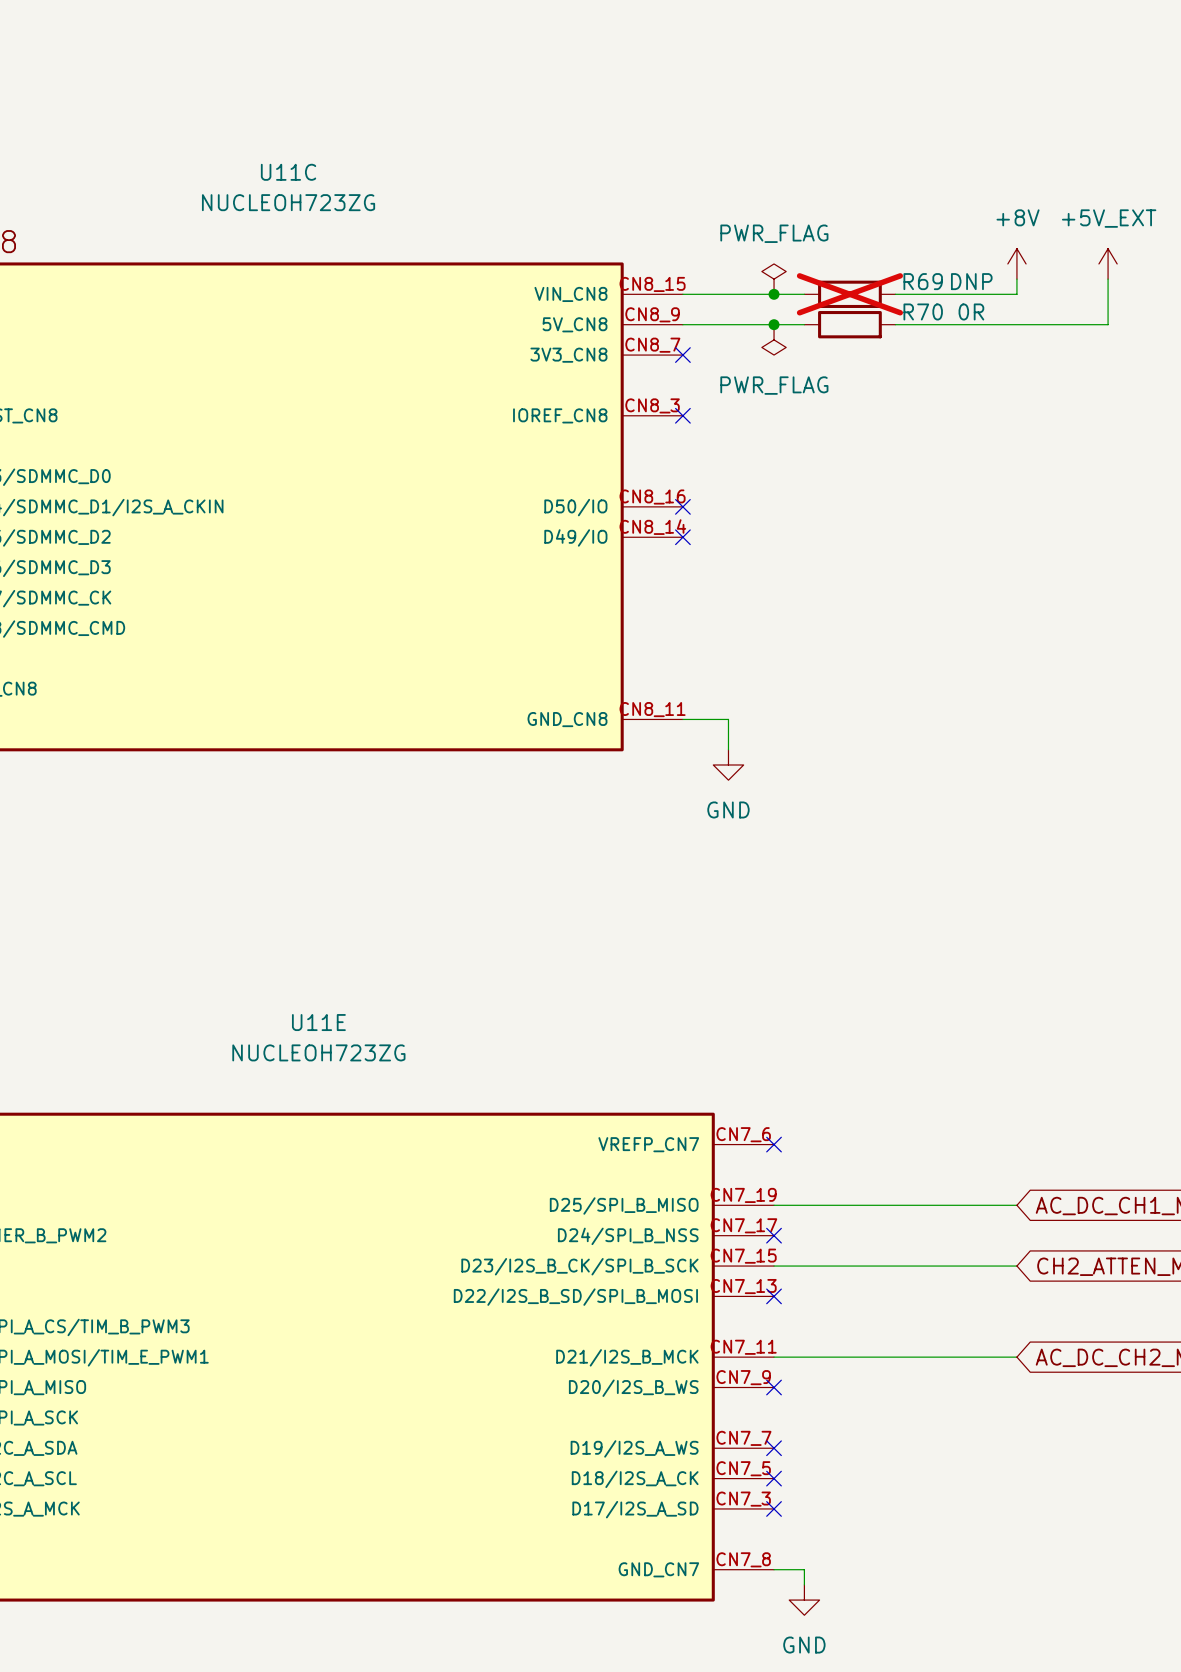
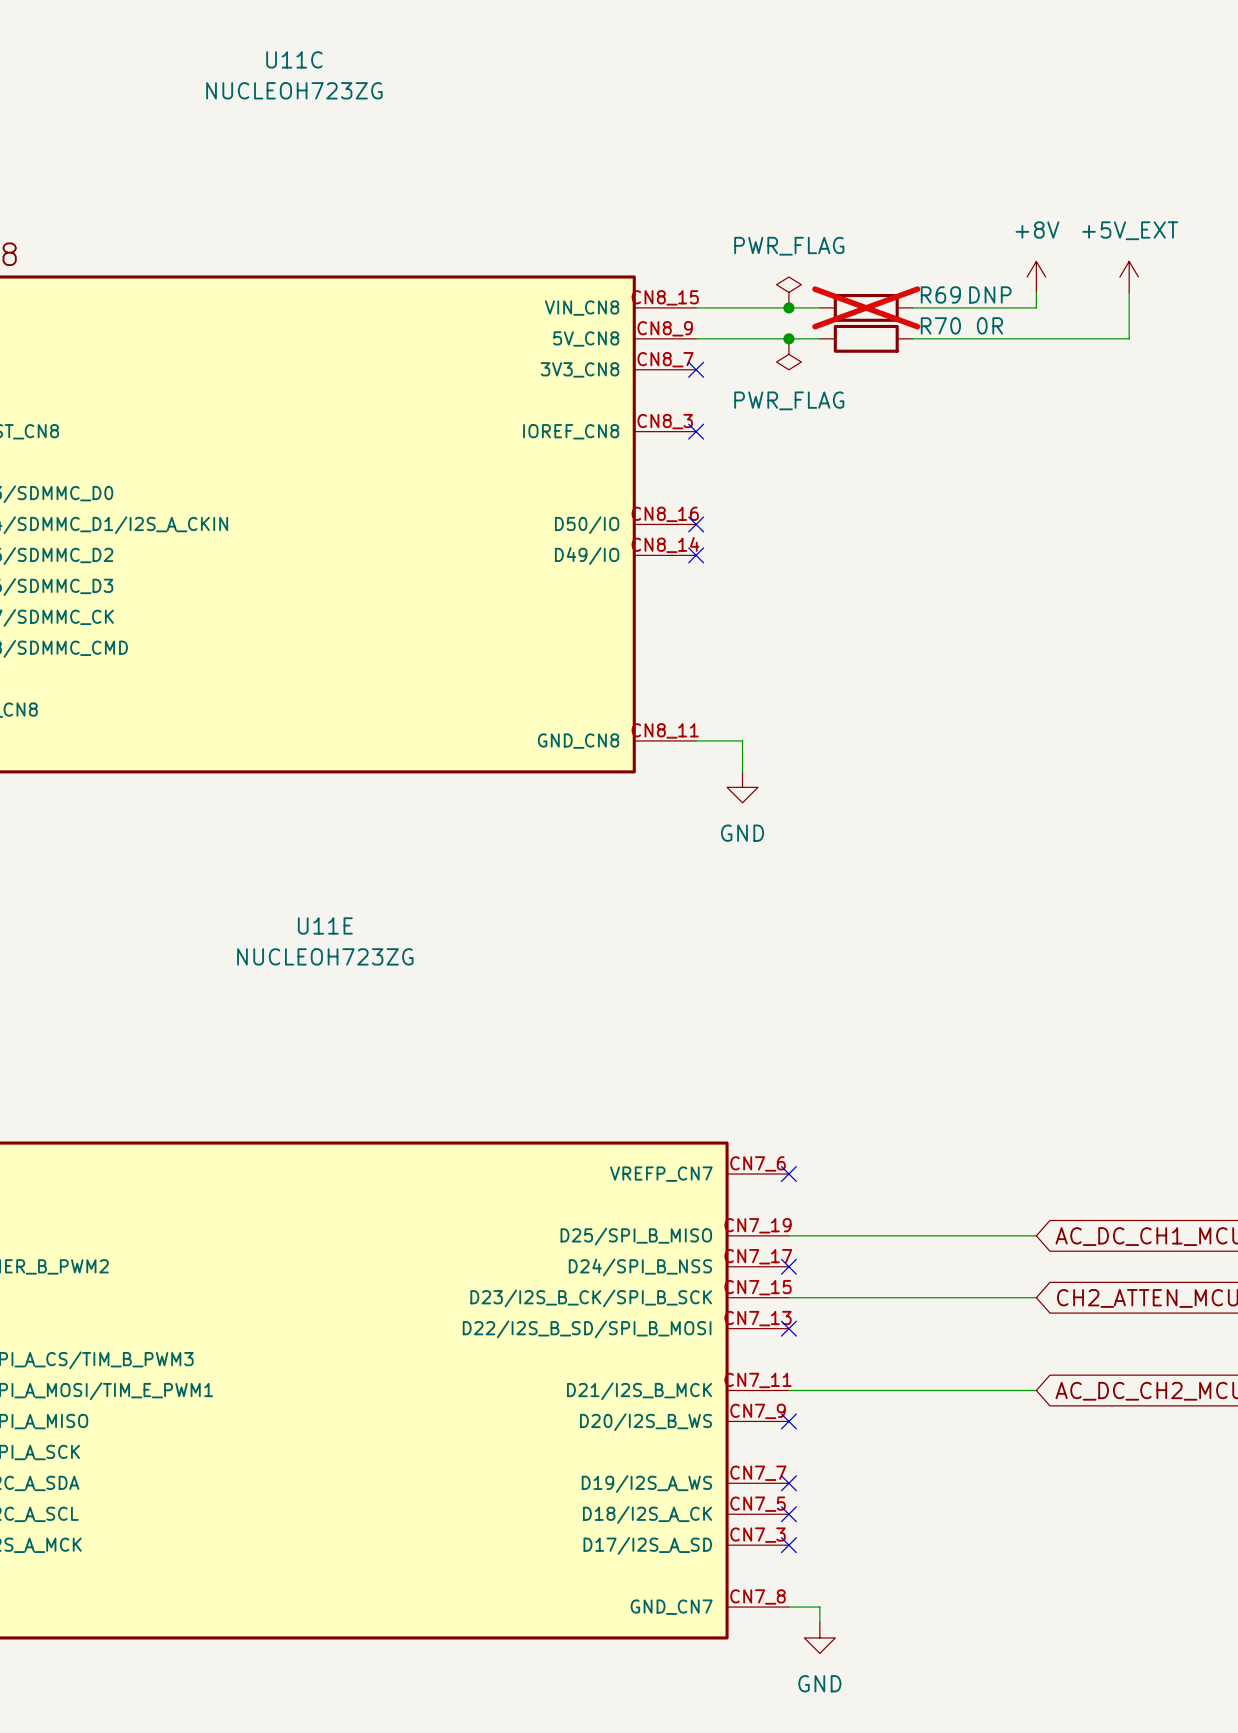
U11C name position: U11C (288, 172) -> U11C (294, 59)
U11C value position: NUCLEOH723ZG (288, 202) -> NUCLEOH723ZG (294, 90)
U11E name position: U11E (318, 1022) -> U11E (325, 925)
U11E value position: NUCLEOH723ZG (318, 1052) -> NUCLEOH723ZG (325, 956)

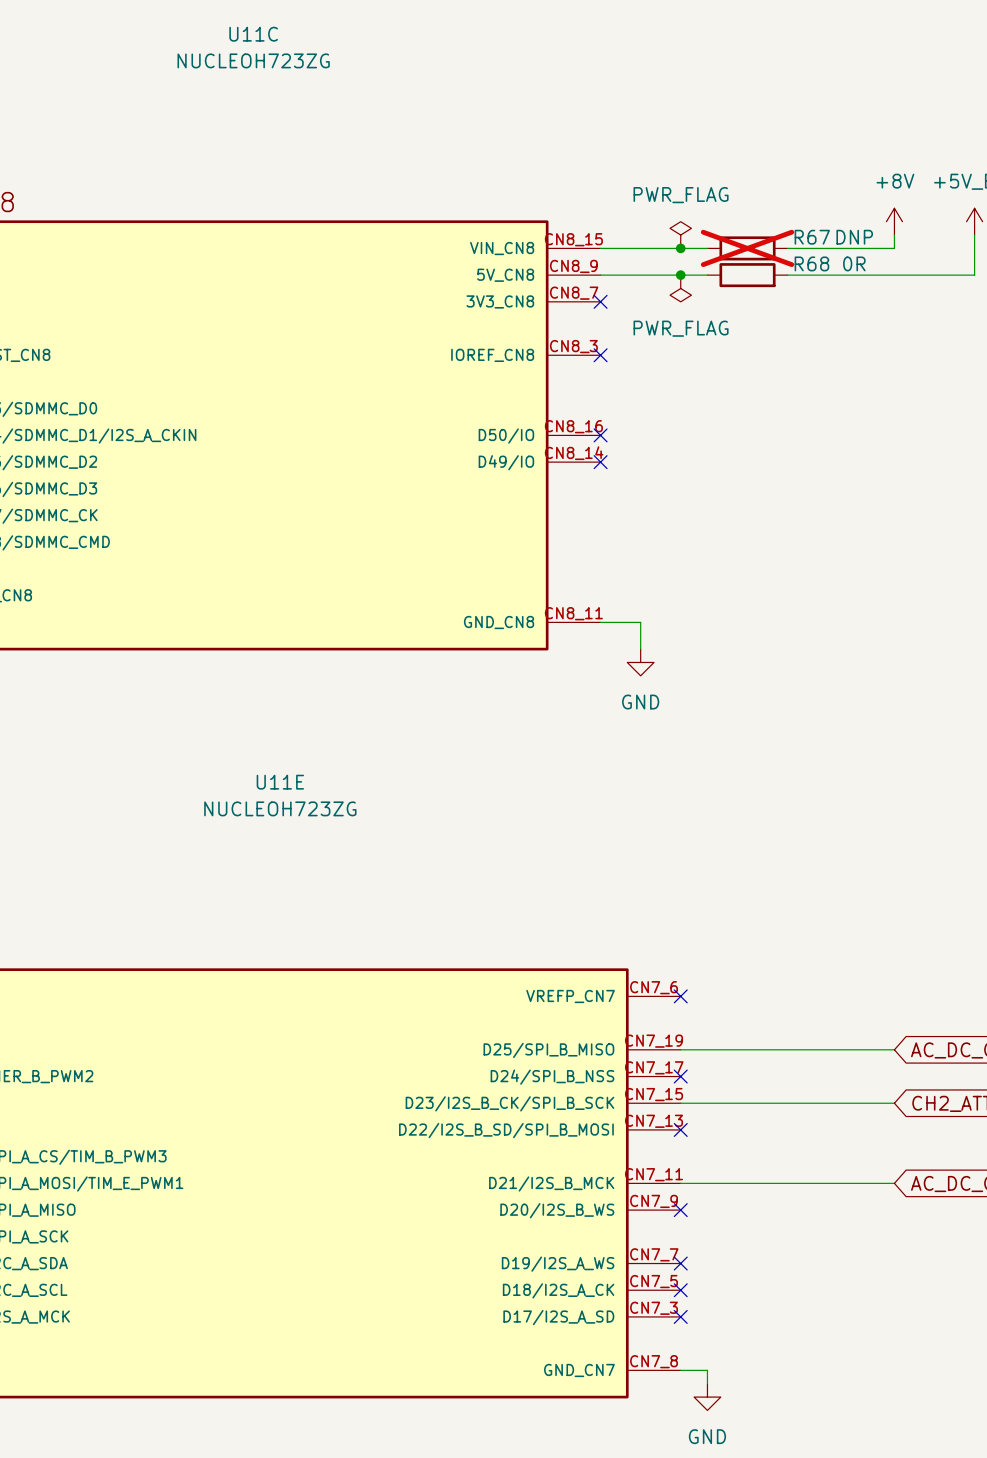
R69 name: R69 (940, 294) -> R67 (812, 237)
R70 name: R70 (940, 325) -> R68 (811, 263)

